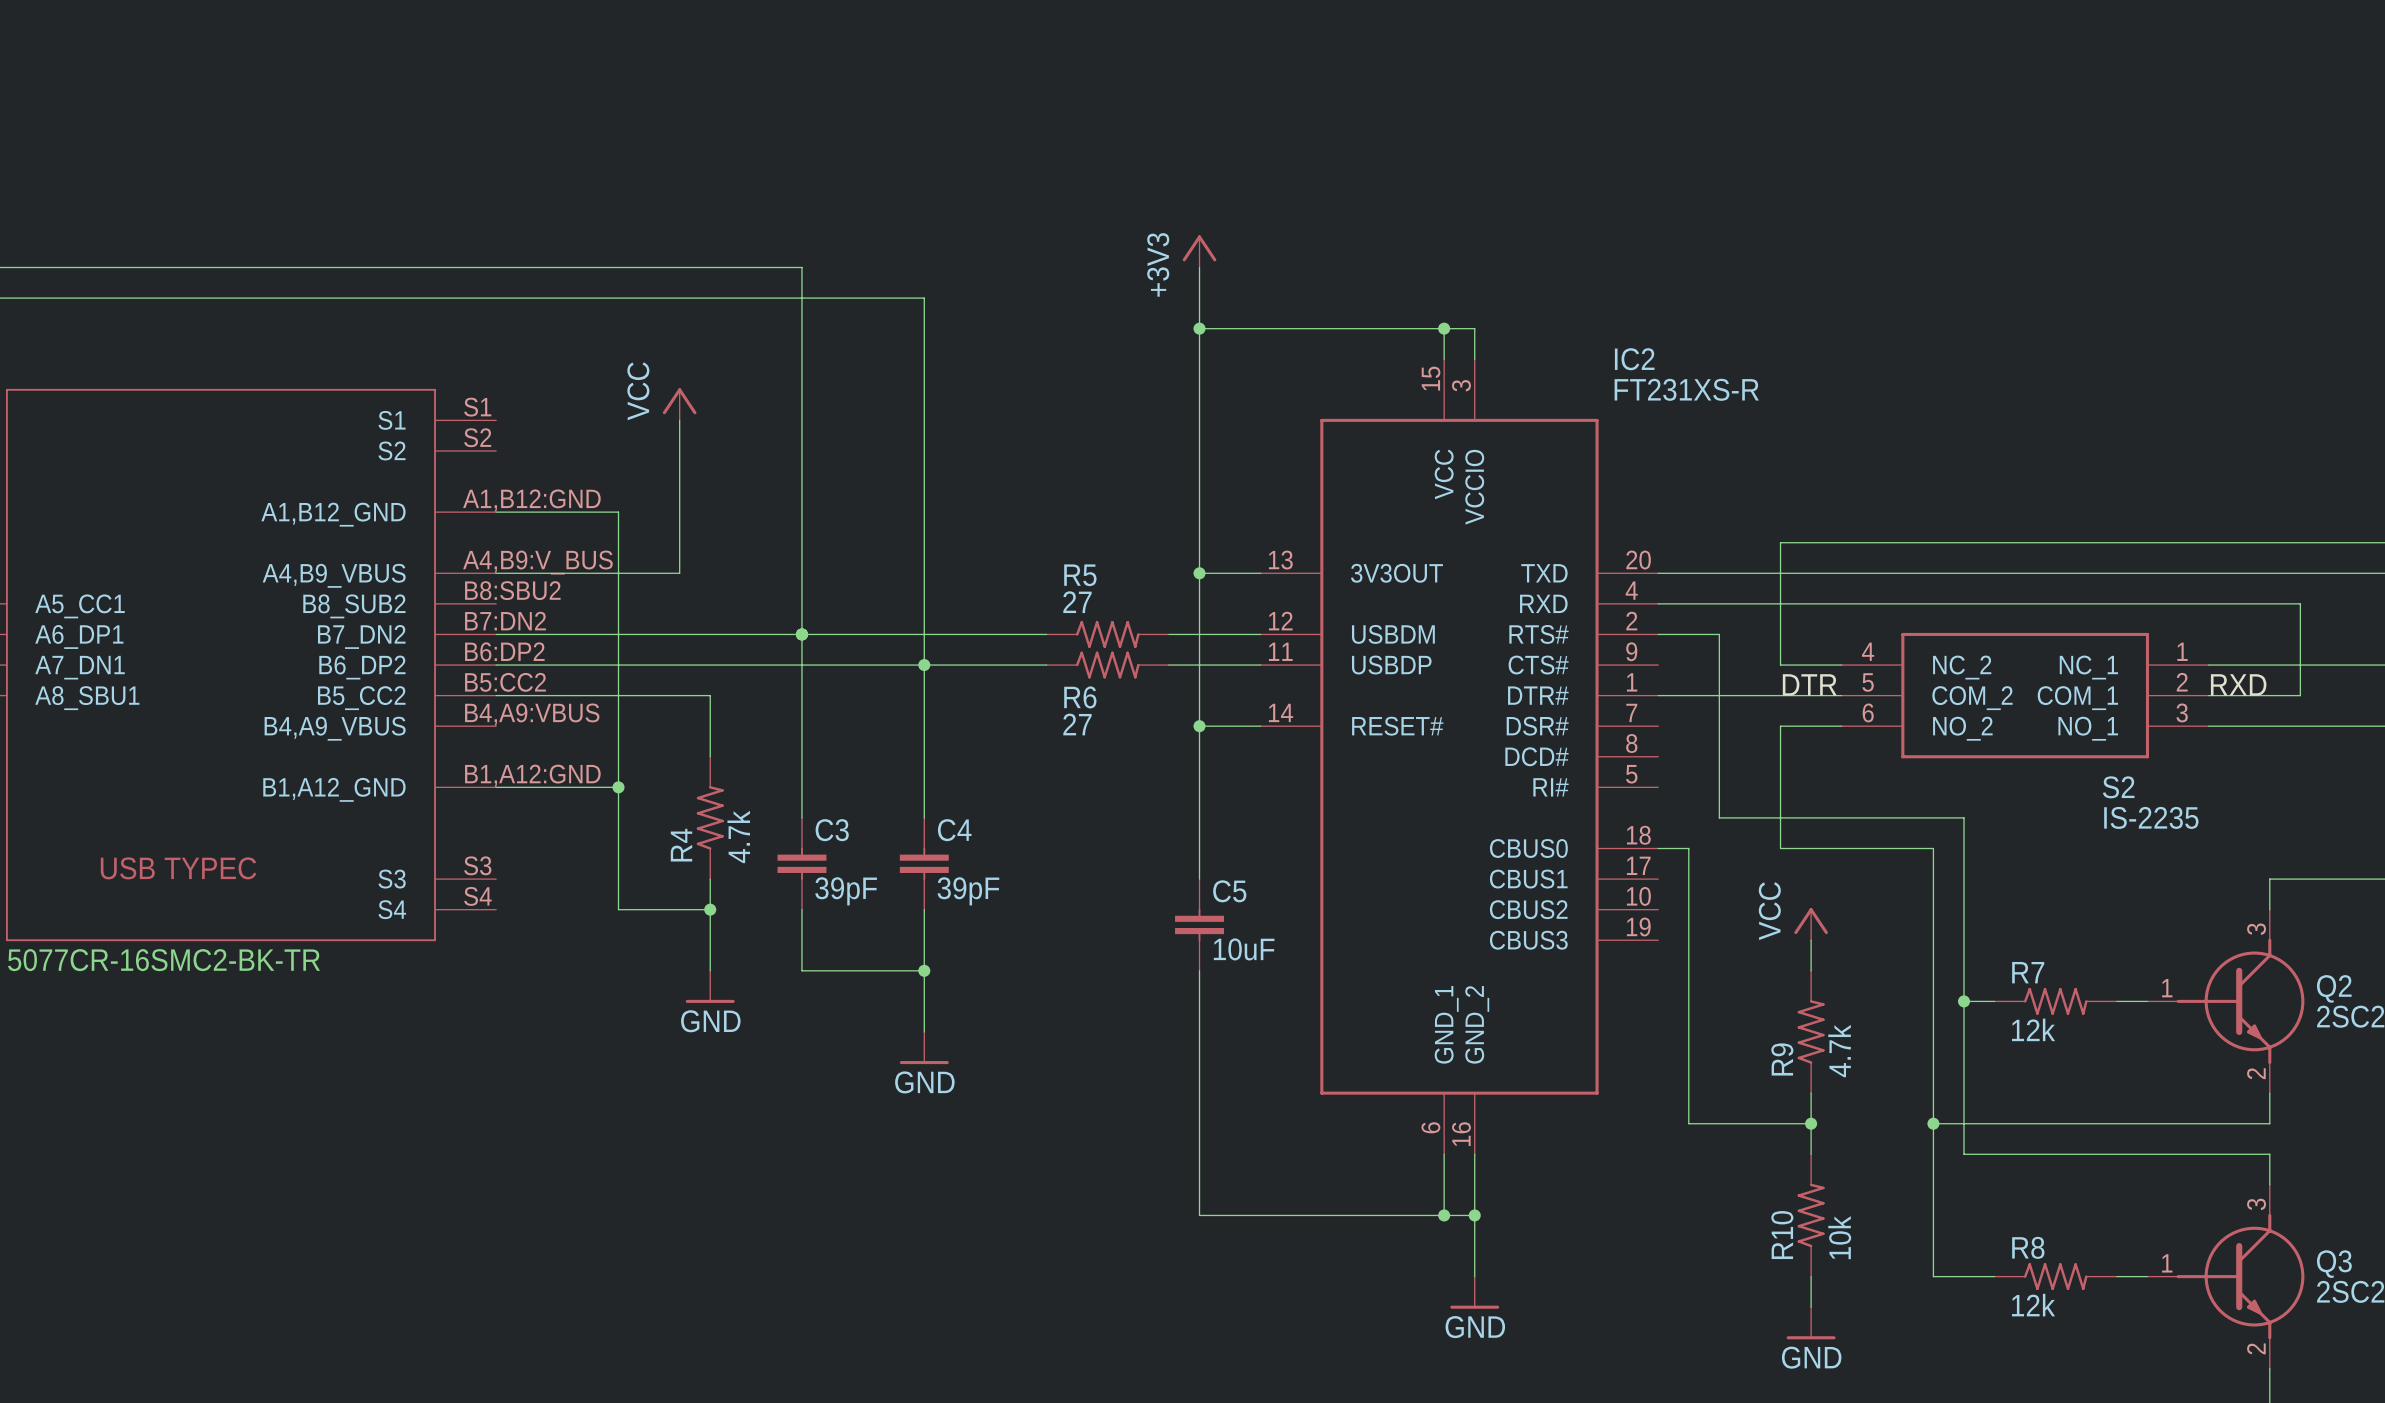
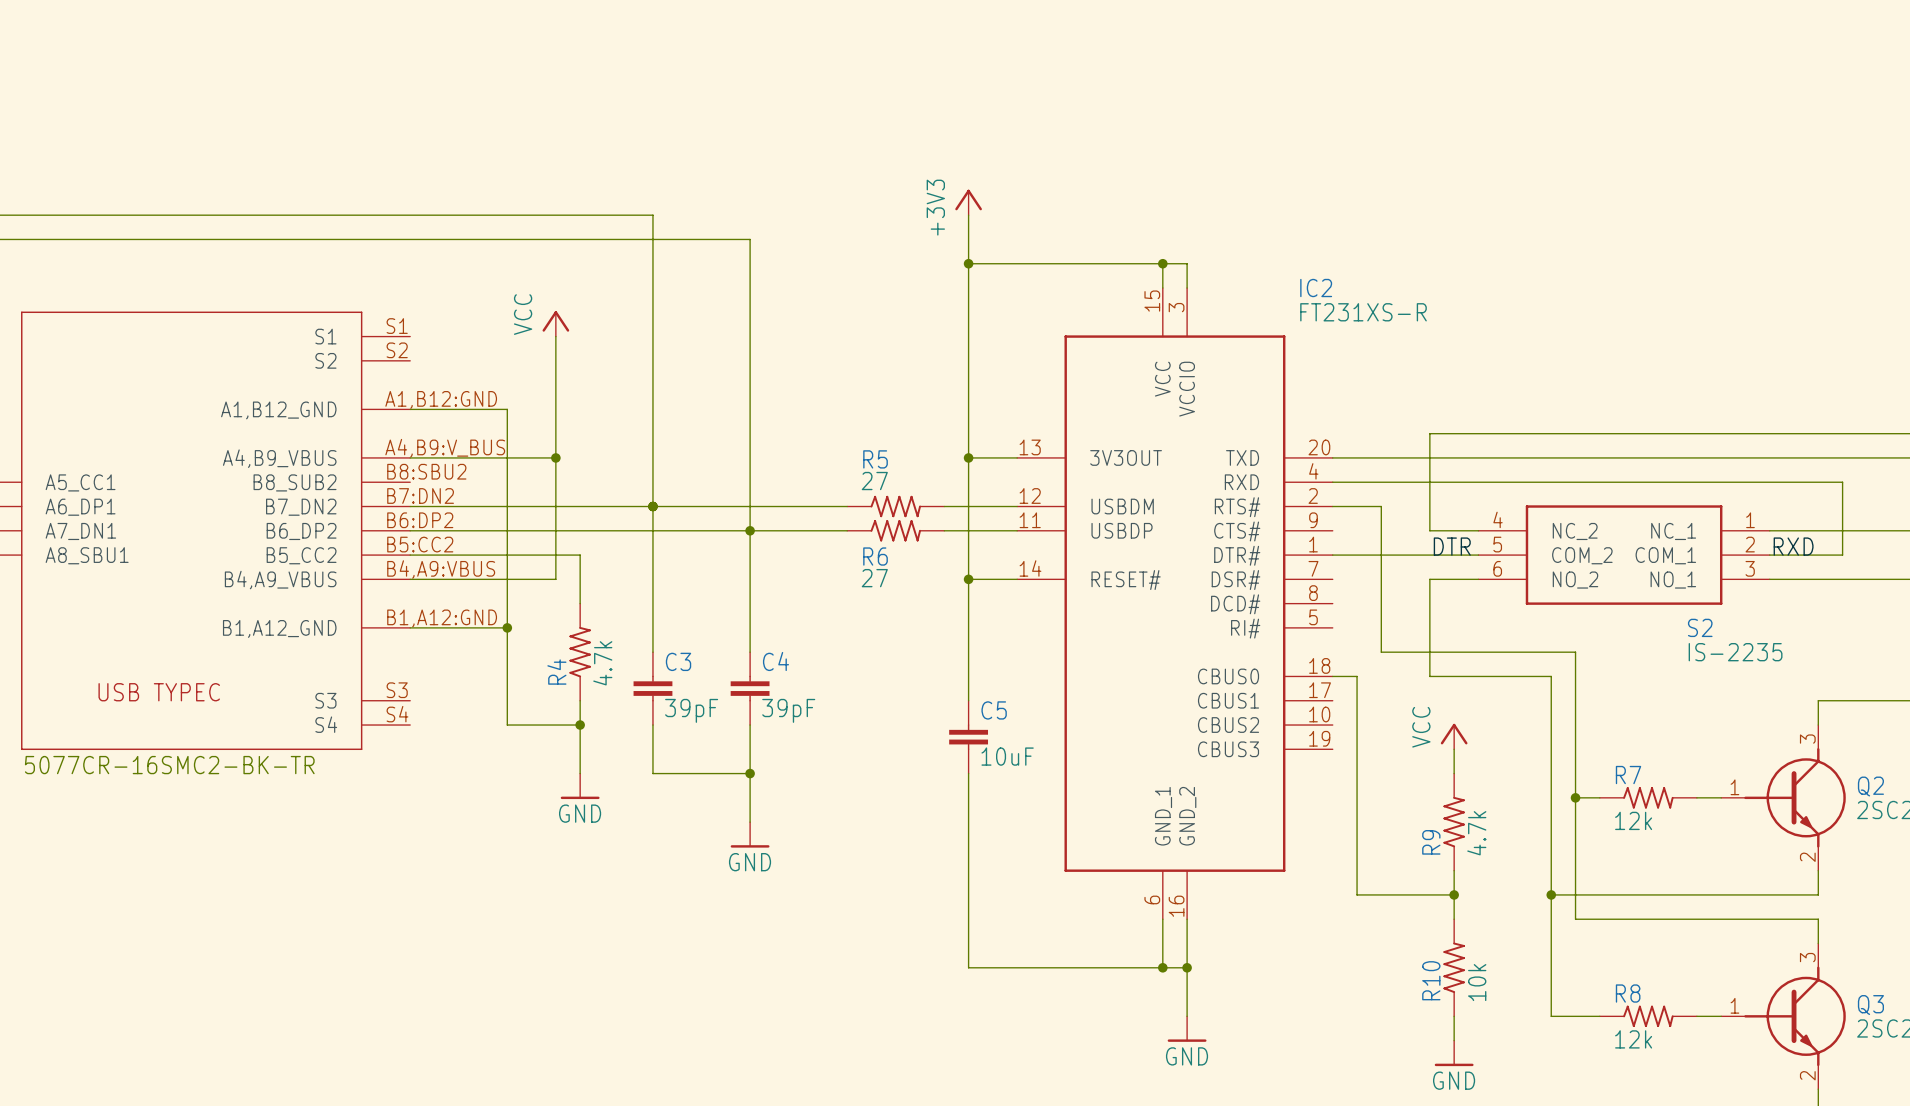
wire: none -> (555, 457) (555, 579) (410, 579)
junction: none -> (555, 457)

